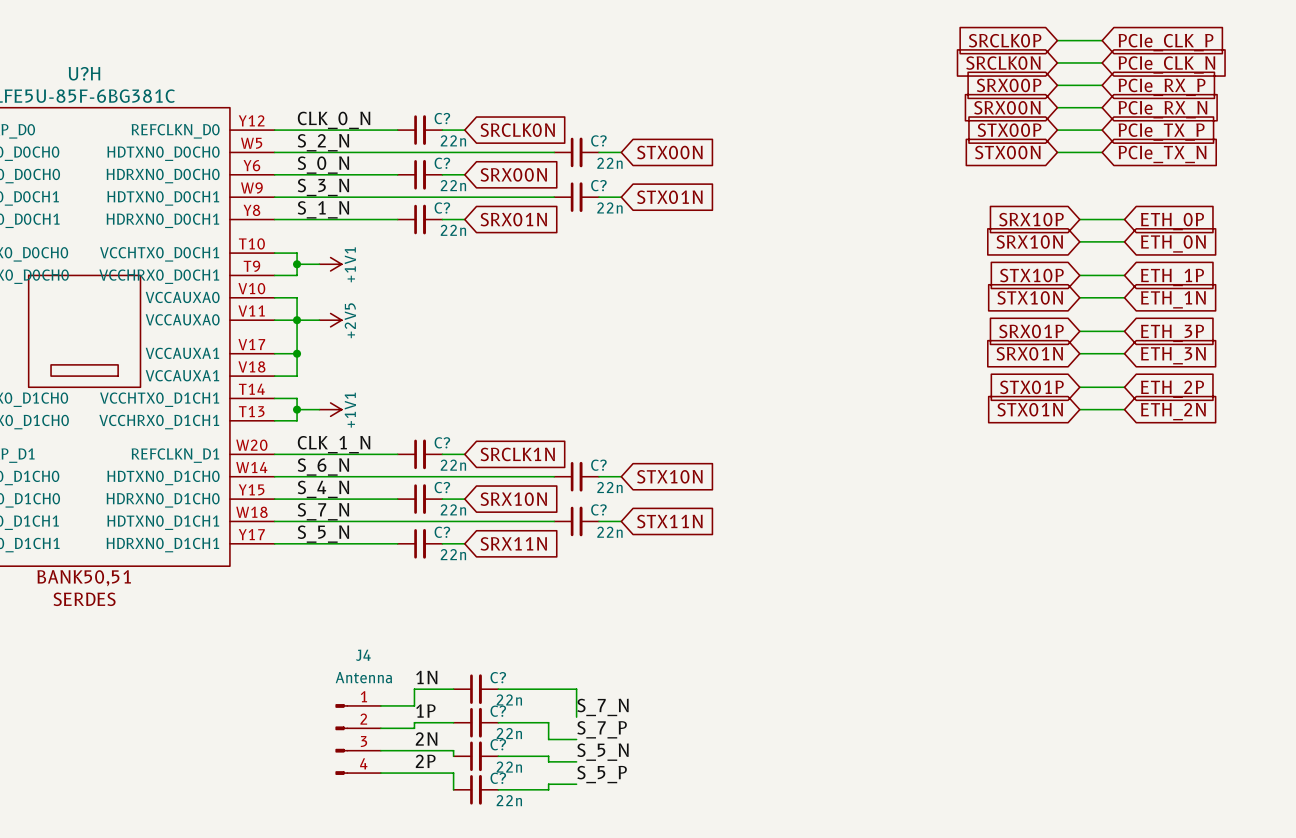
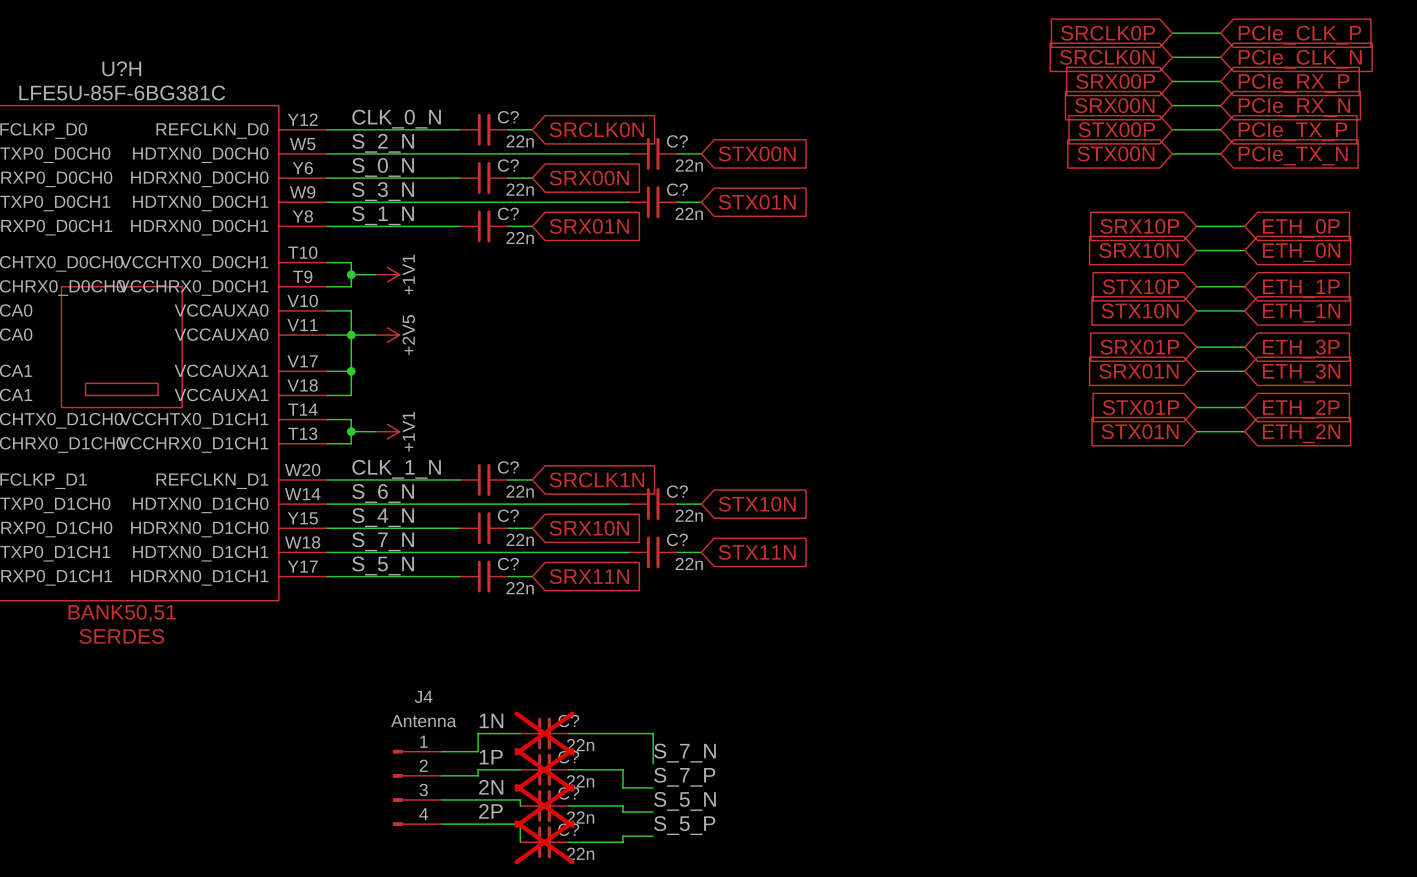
C? do-not-place cross: none -> (544, 733)
C? do-not-place cross: none -> (544, 769)
C? do-not-place cross: none -> (544, 806)
C? do-not-place cross: none -> (544, 842)

